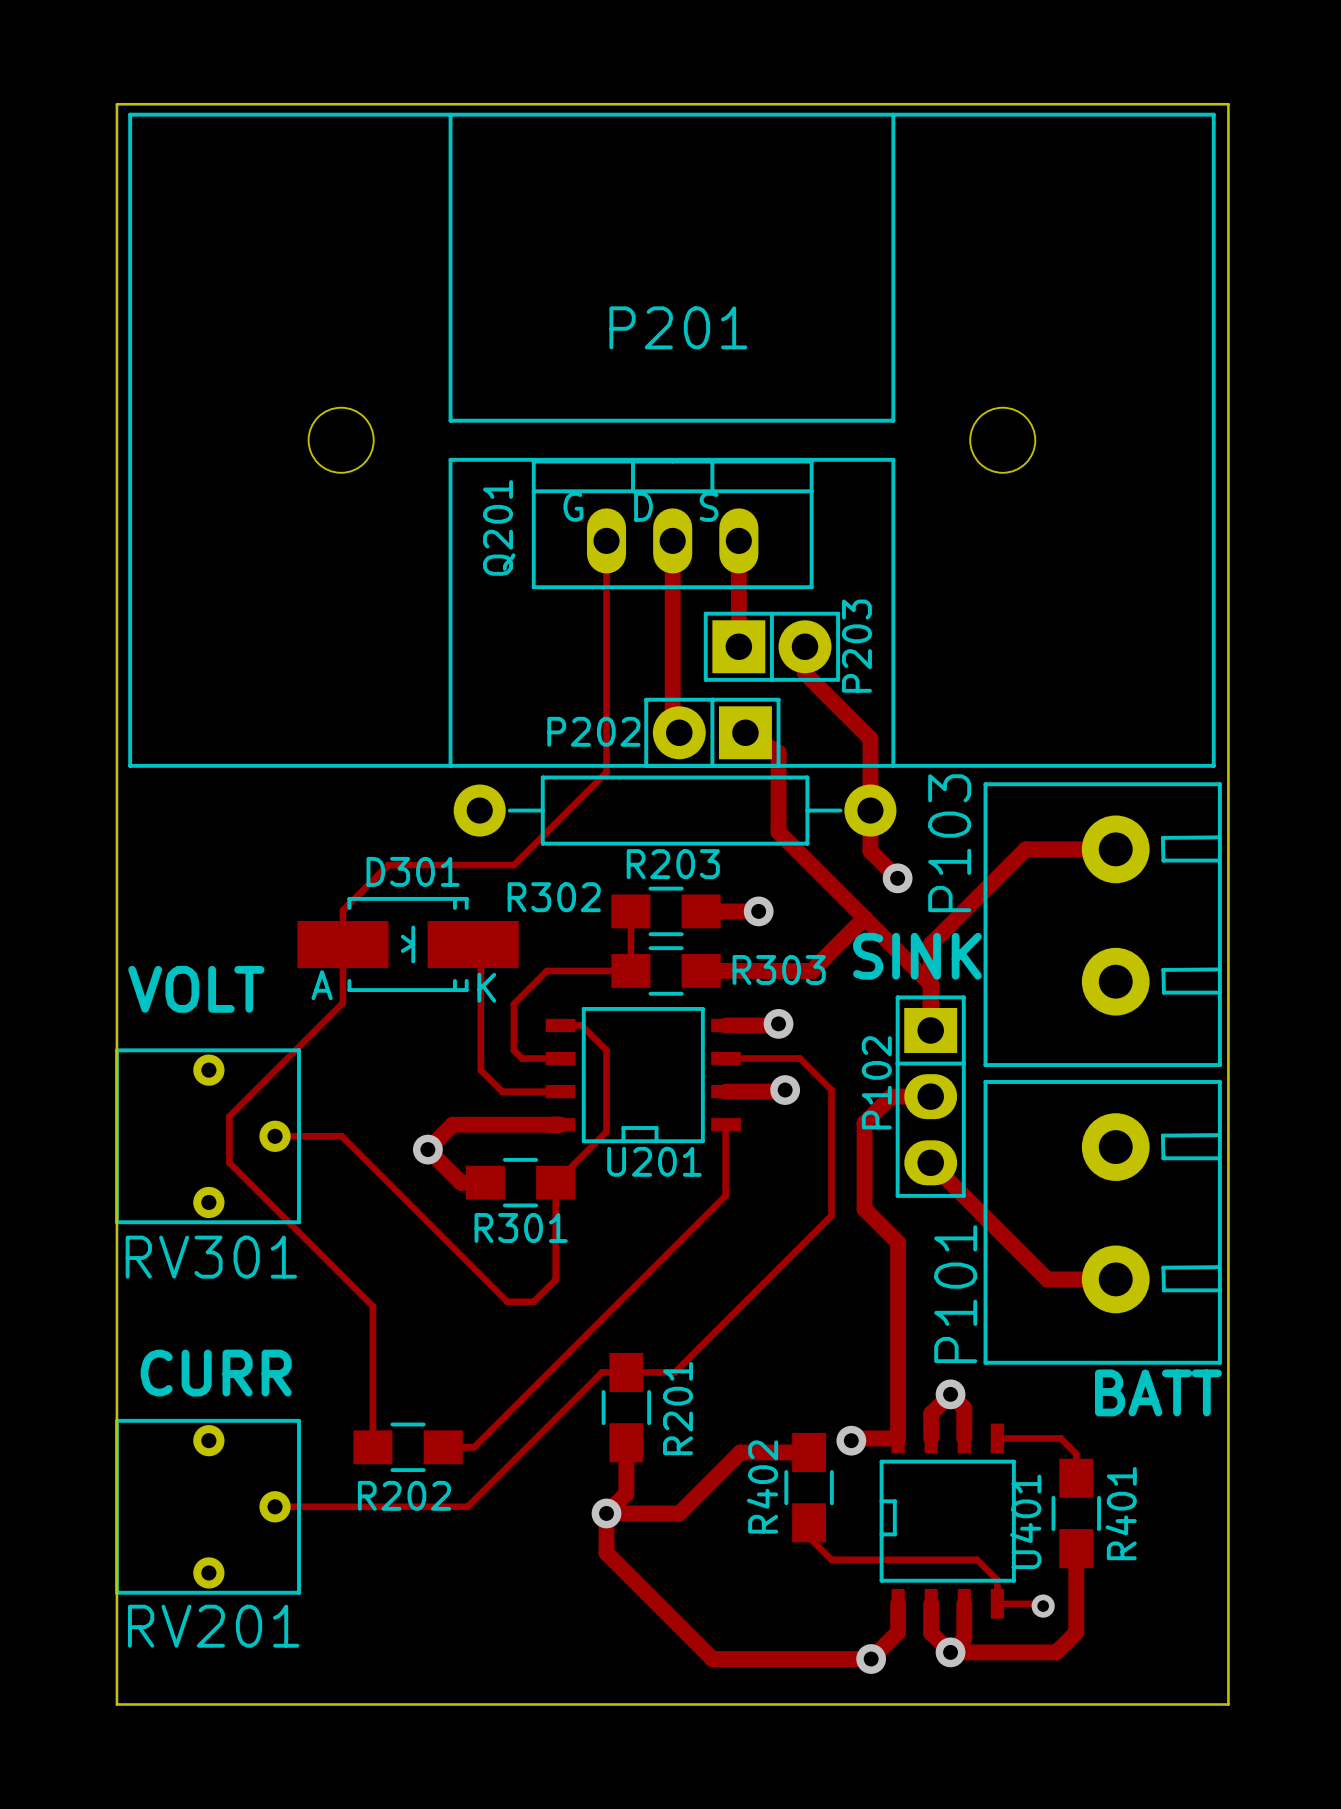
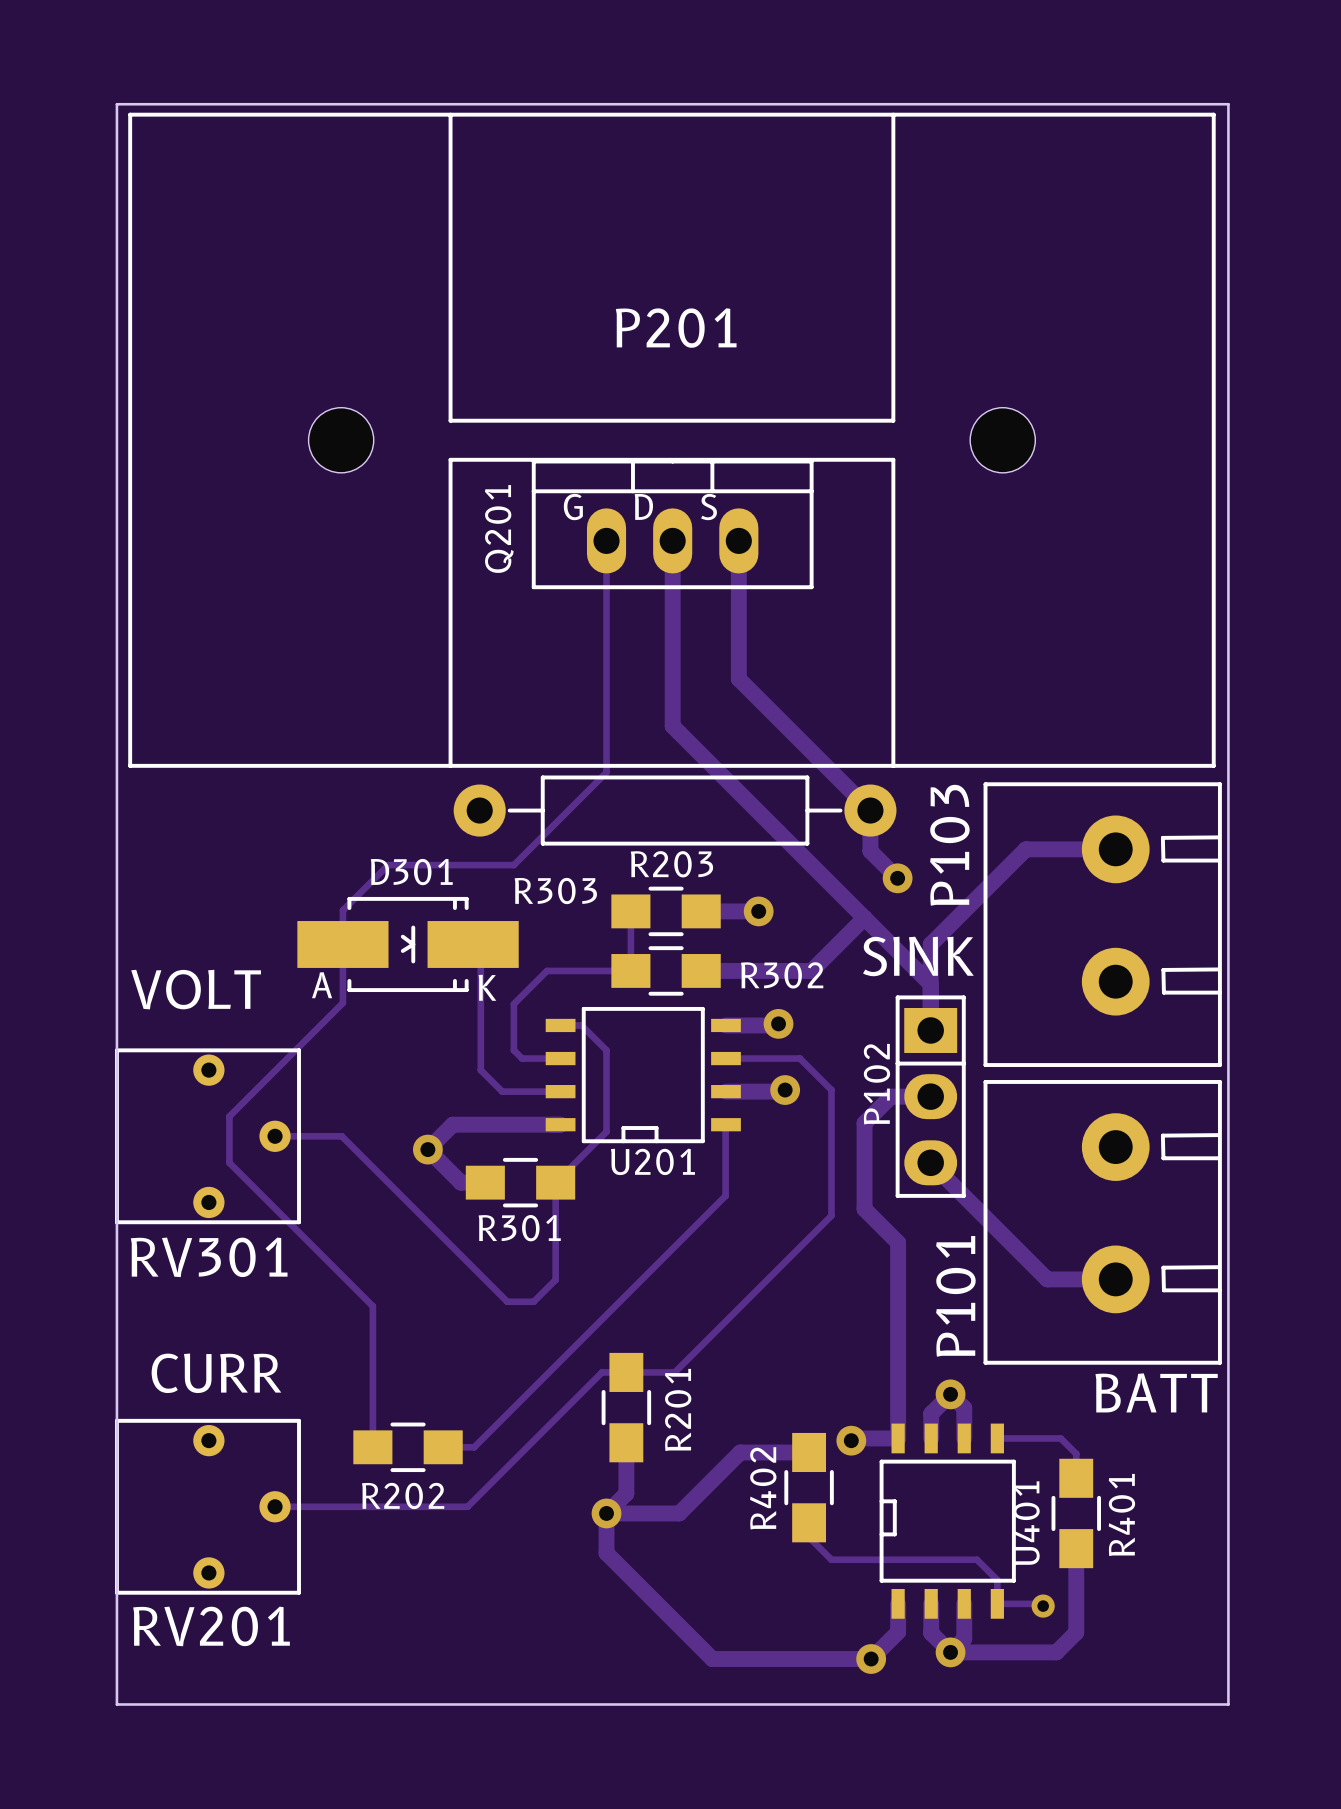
P203: (771, 646) -> none
track: (805, 646) (805, 673) (870, 738) (870, 810) -> (738, 646) (738, 678) (870, 810)
P202: (712, 732) -> none
track: (745, 732) (778, 752) (778, 832) -> (679, 732) (778, 832)
R302 name position: R302 (554, 897) -> R302 (782, 975)
R303 name position: R303 (779, 969) -> R303 (555, 891)

